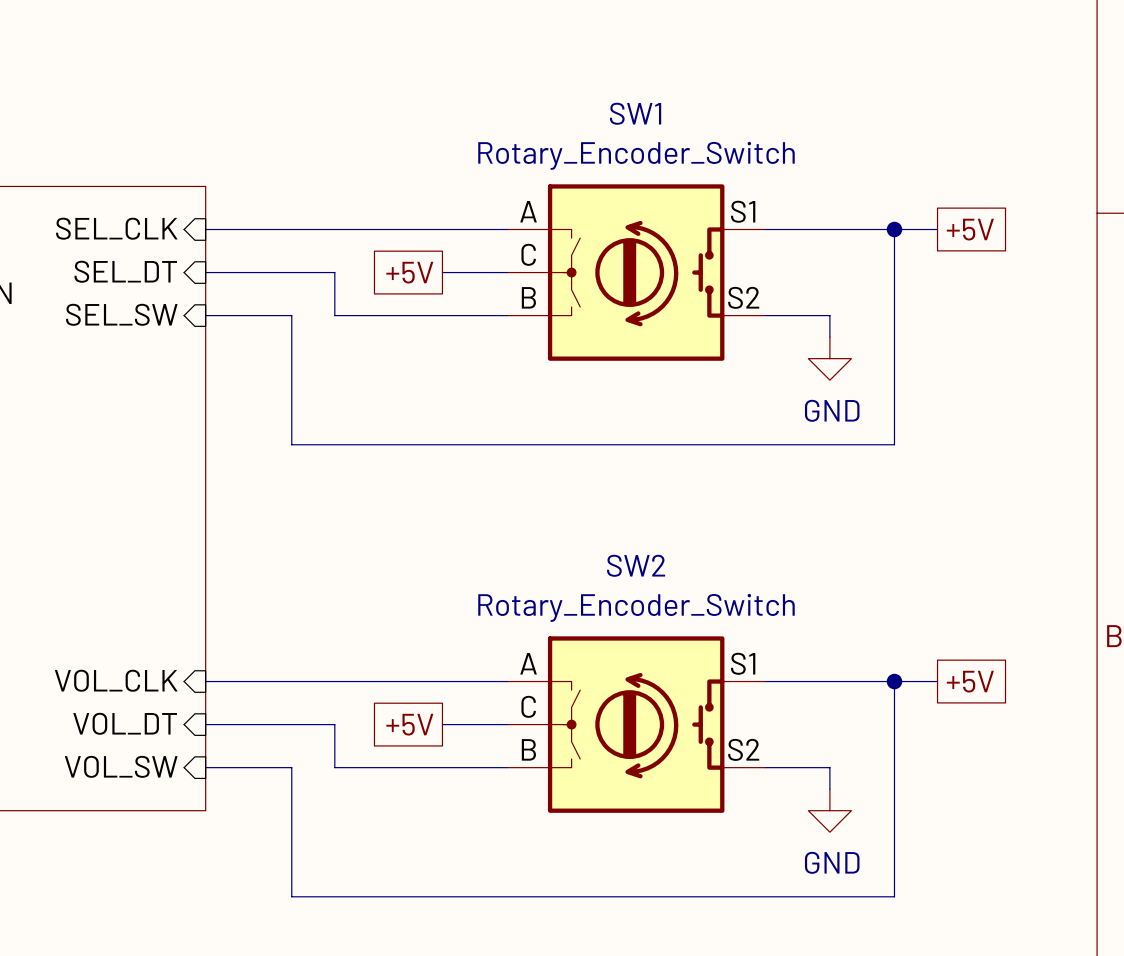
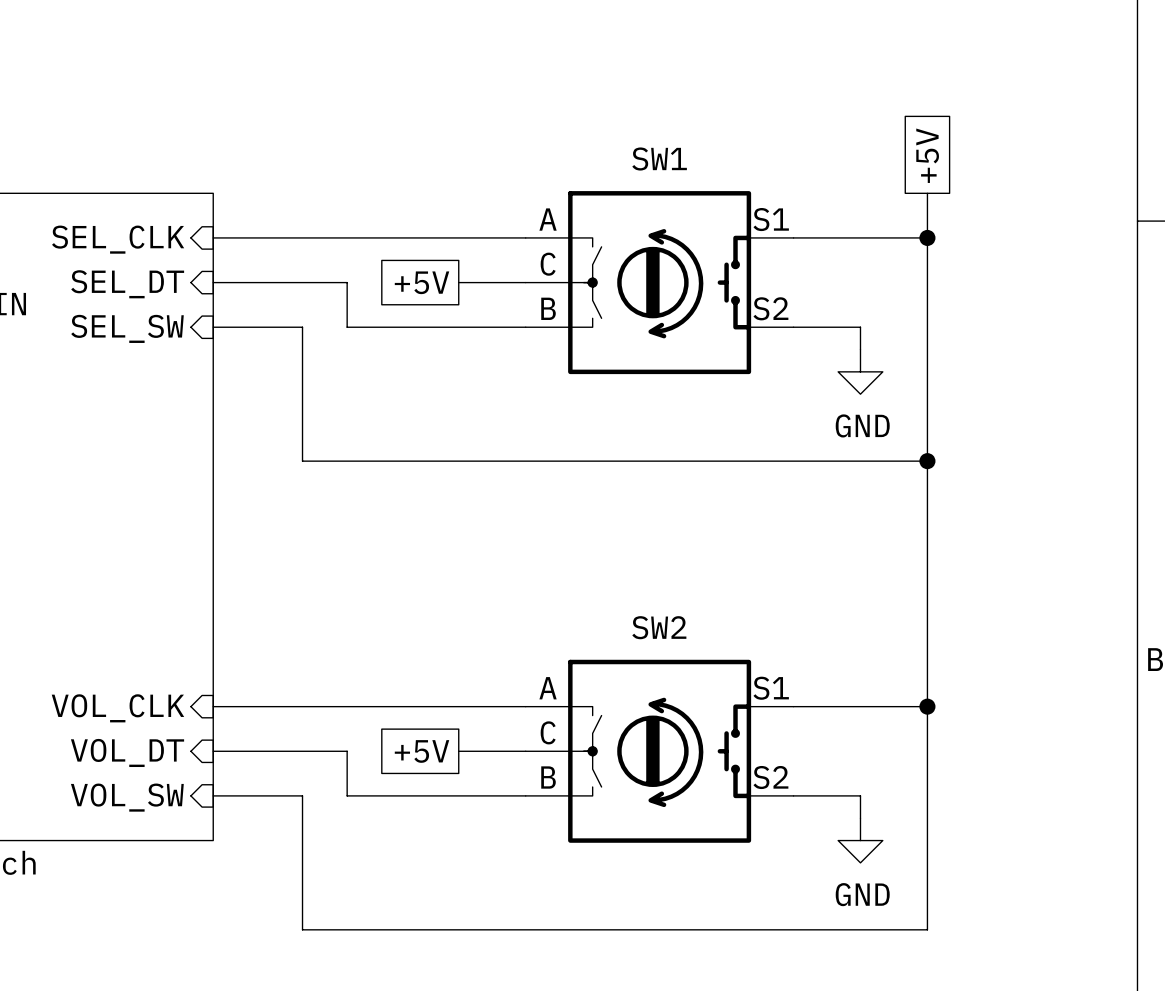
SW1 name position: SW1 (635, 113) -> SW1 (659, 159)
SW1 value: Rotary_Encoder_Switch (636, 155) -> none
wire: (894, 229) (937, 229) -> (927, 237) (927, 193)
global label rotation: 0° (970, 229) -> 90° counterclockwise (927, 155)
global label position: +5V (970, 229) -> +5V (927, 155)
junction: none -> (927, 461)
SW2 name position: SW2 (636, 565) -> SW2 (659, 627)
SW2 value: Rotary_Encoder_Switch (636, 607) -> none
wire: (894, 681) (937, 681) -> (927, 706) (927, 461)
global label: +5V (970, 681) -> none

